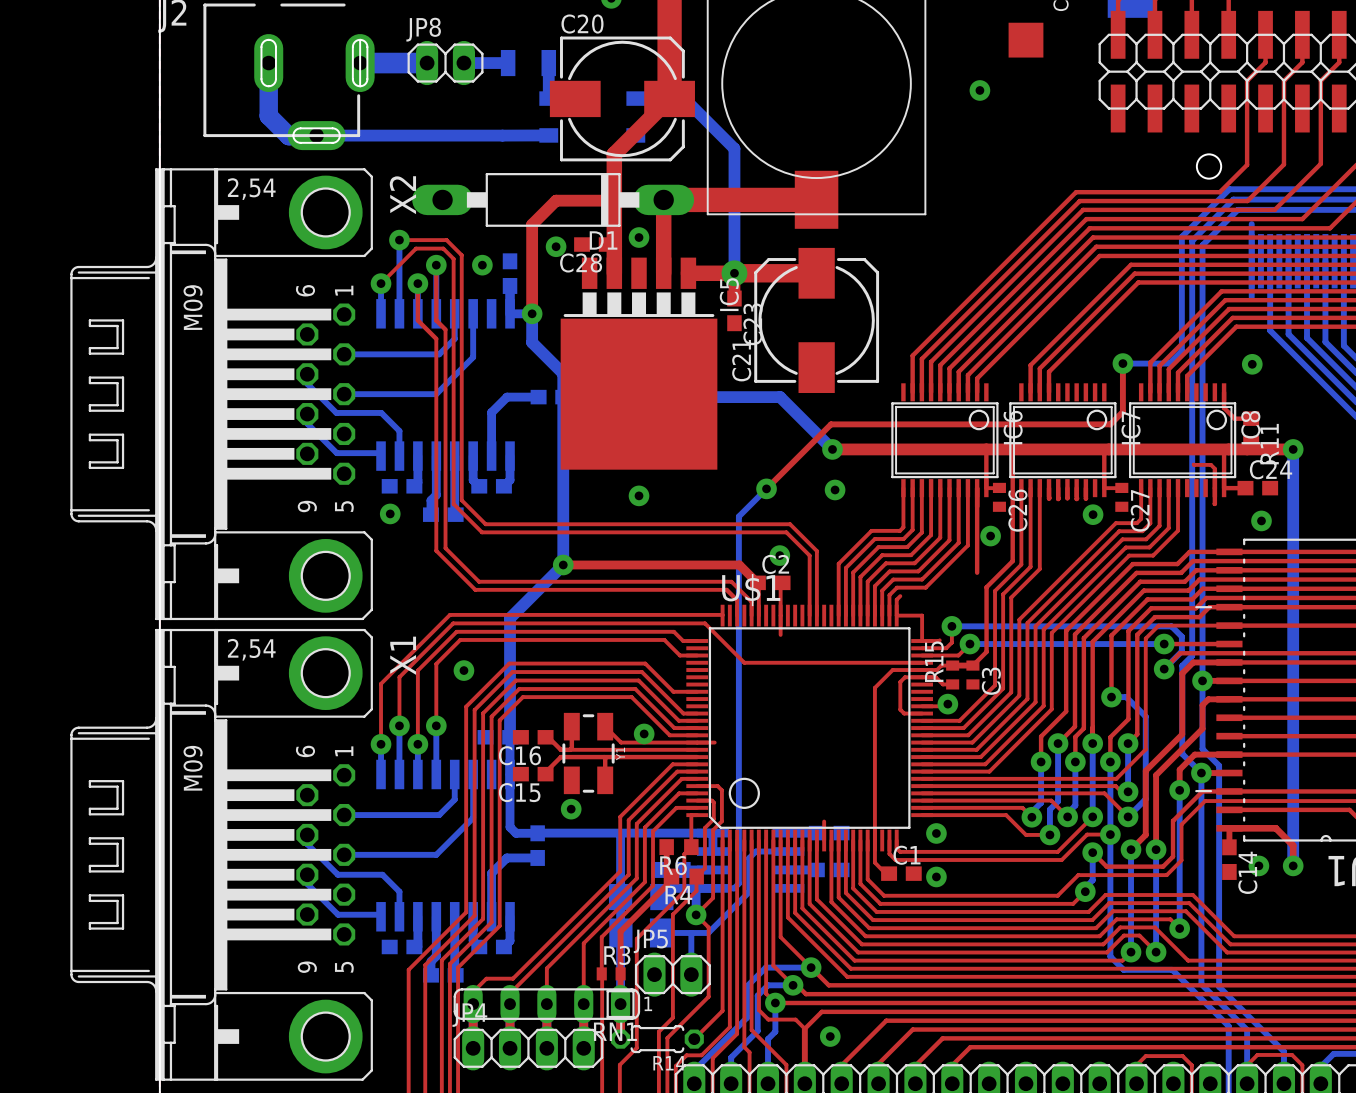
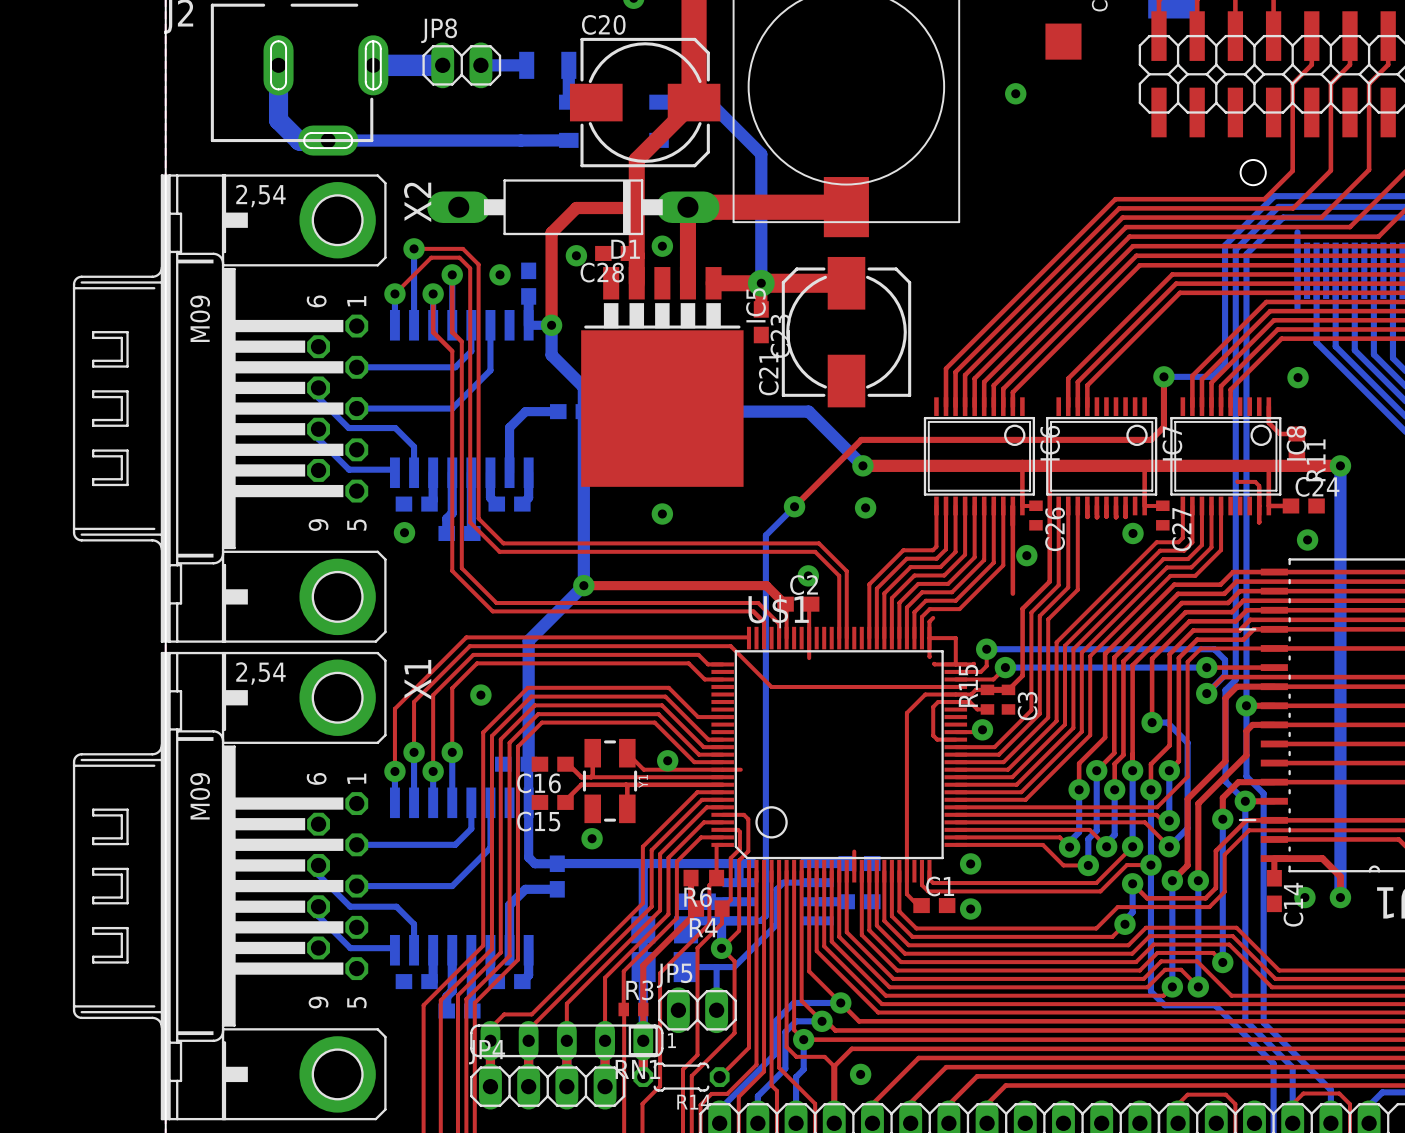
top track: none -> (929, 638) (929, 656)
top track: none -> (933, 663) (955, 664)

